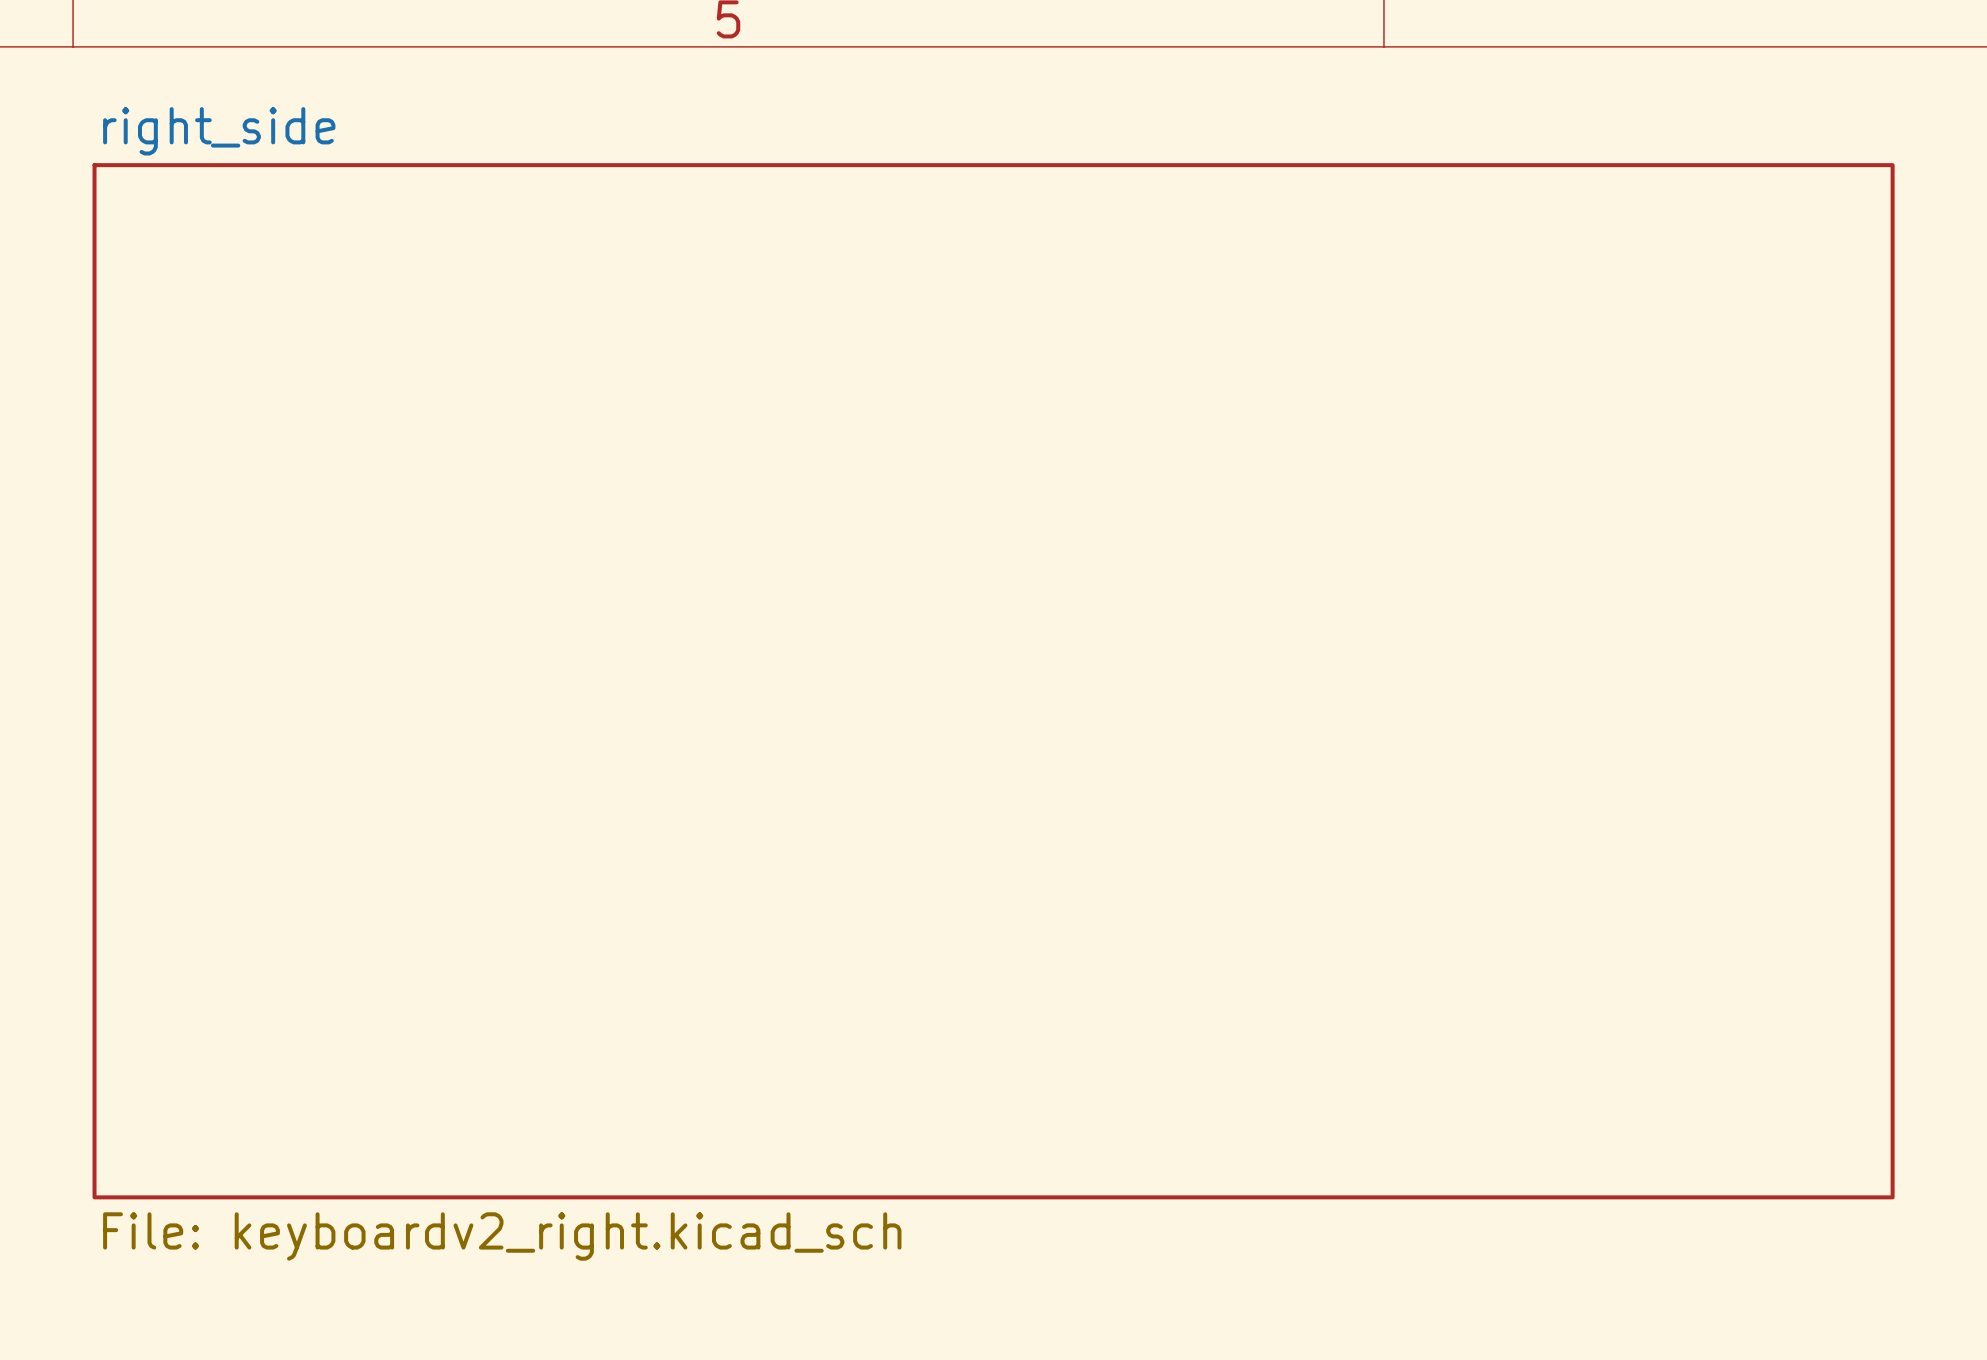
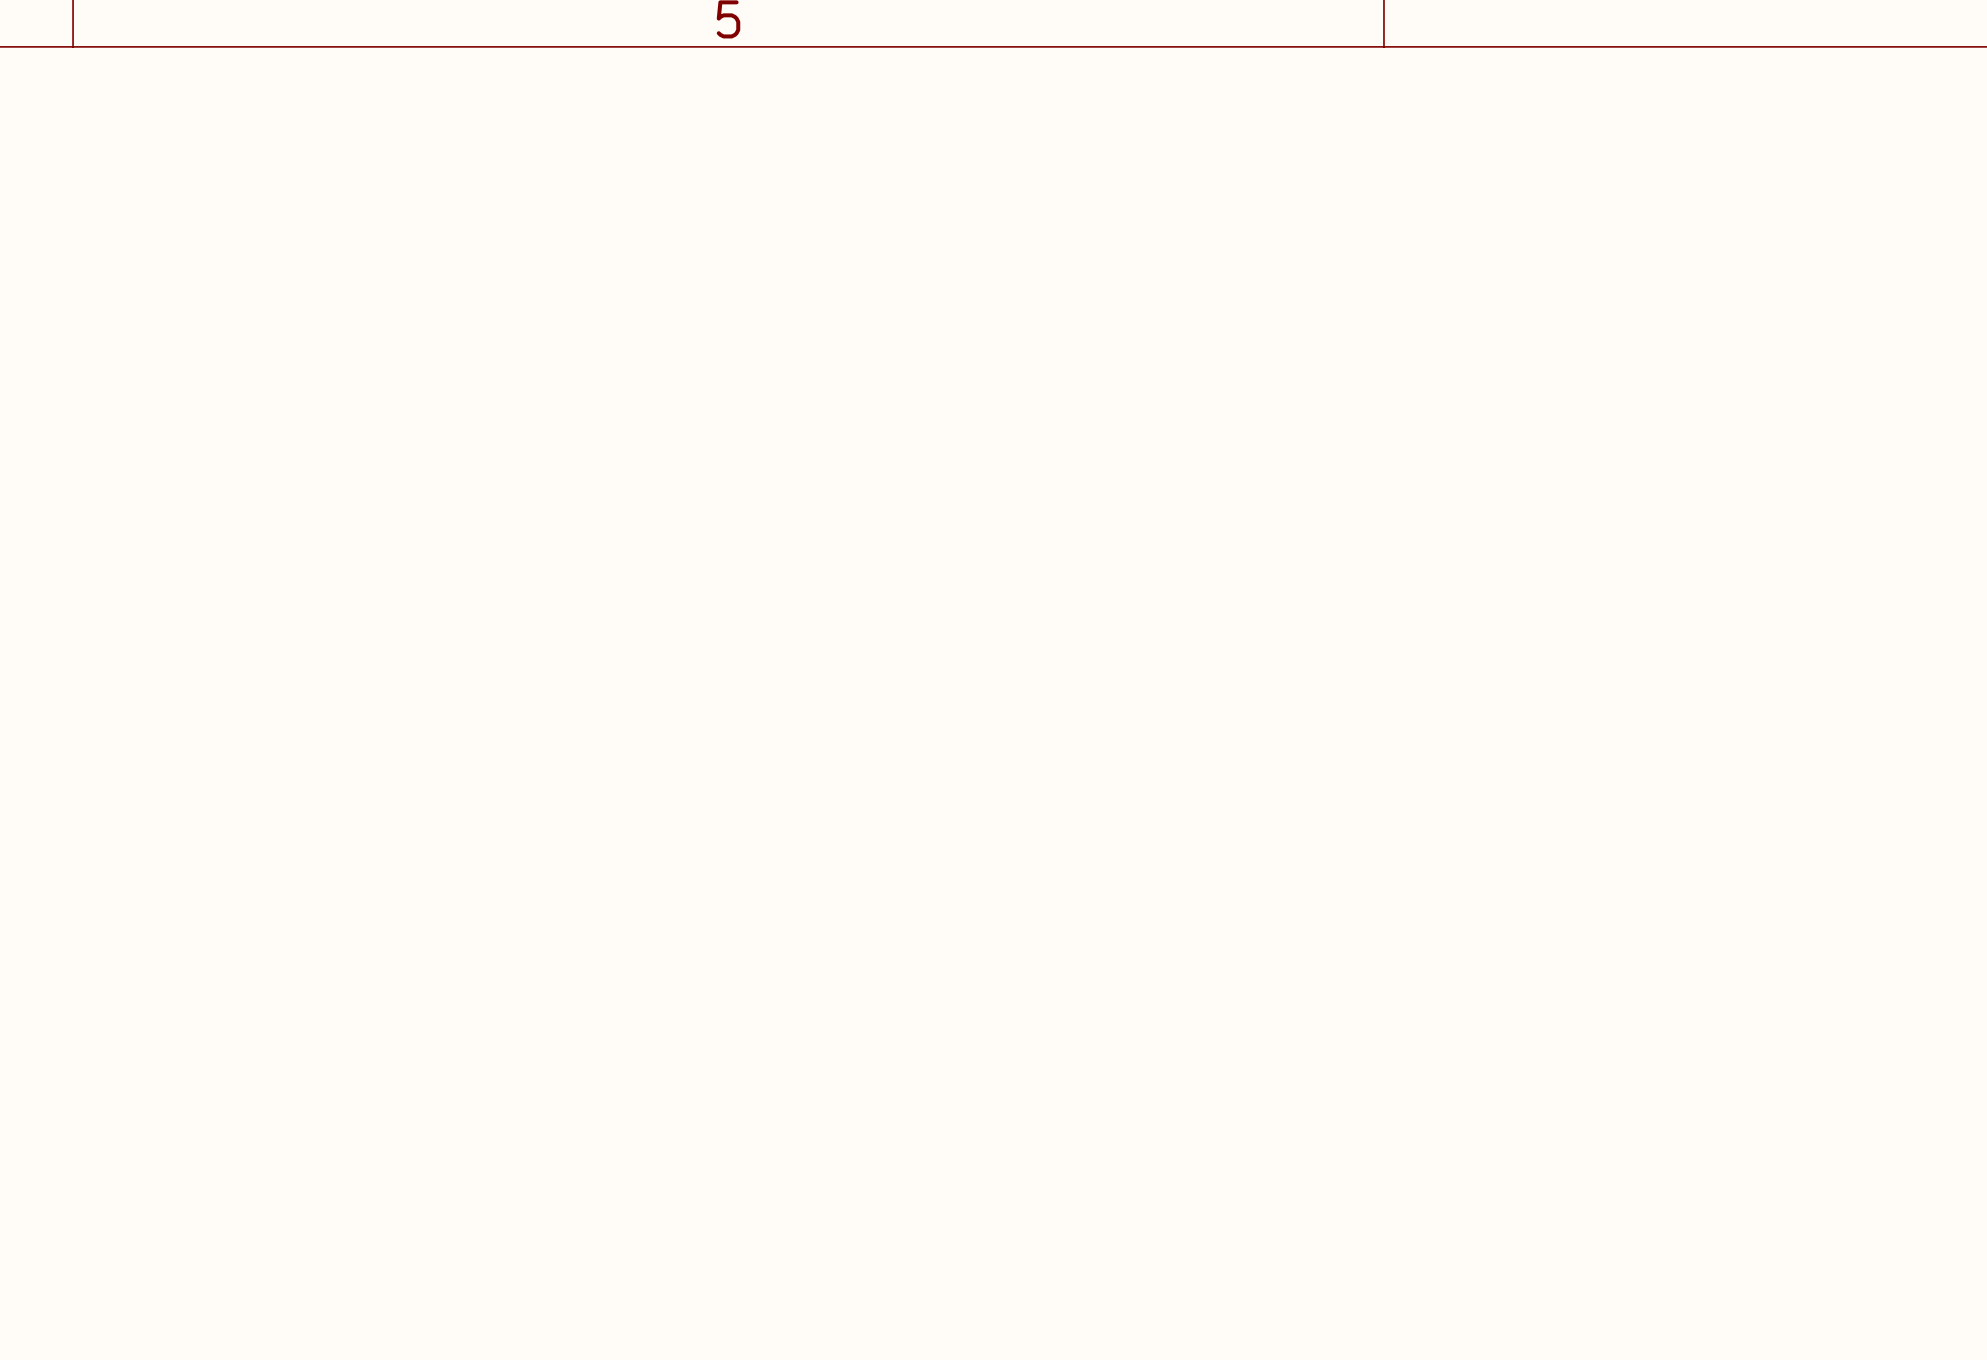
sheet right_side: File: keyboardv2_right.kicad_sch (993, 681) -> none

